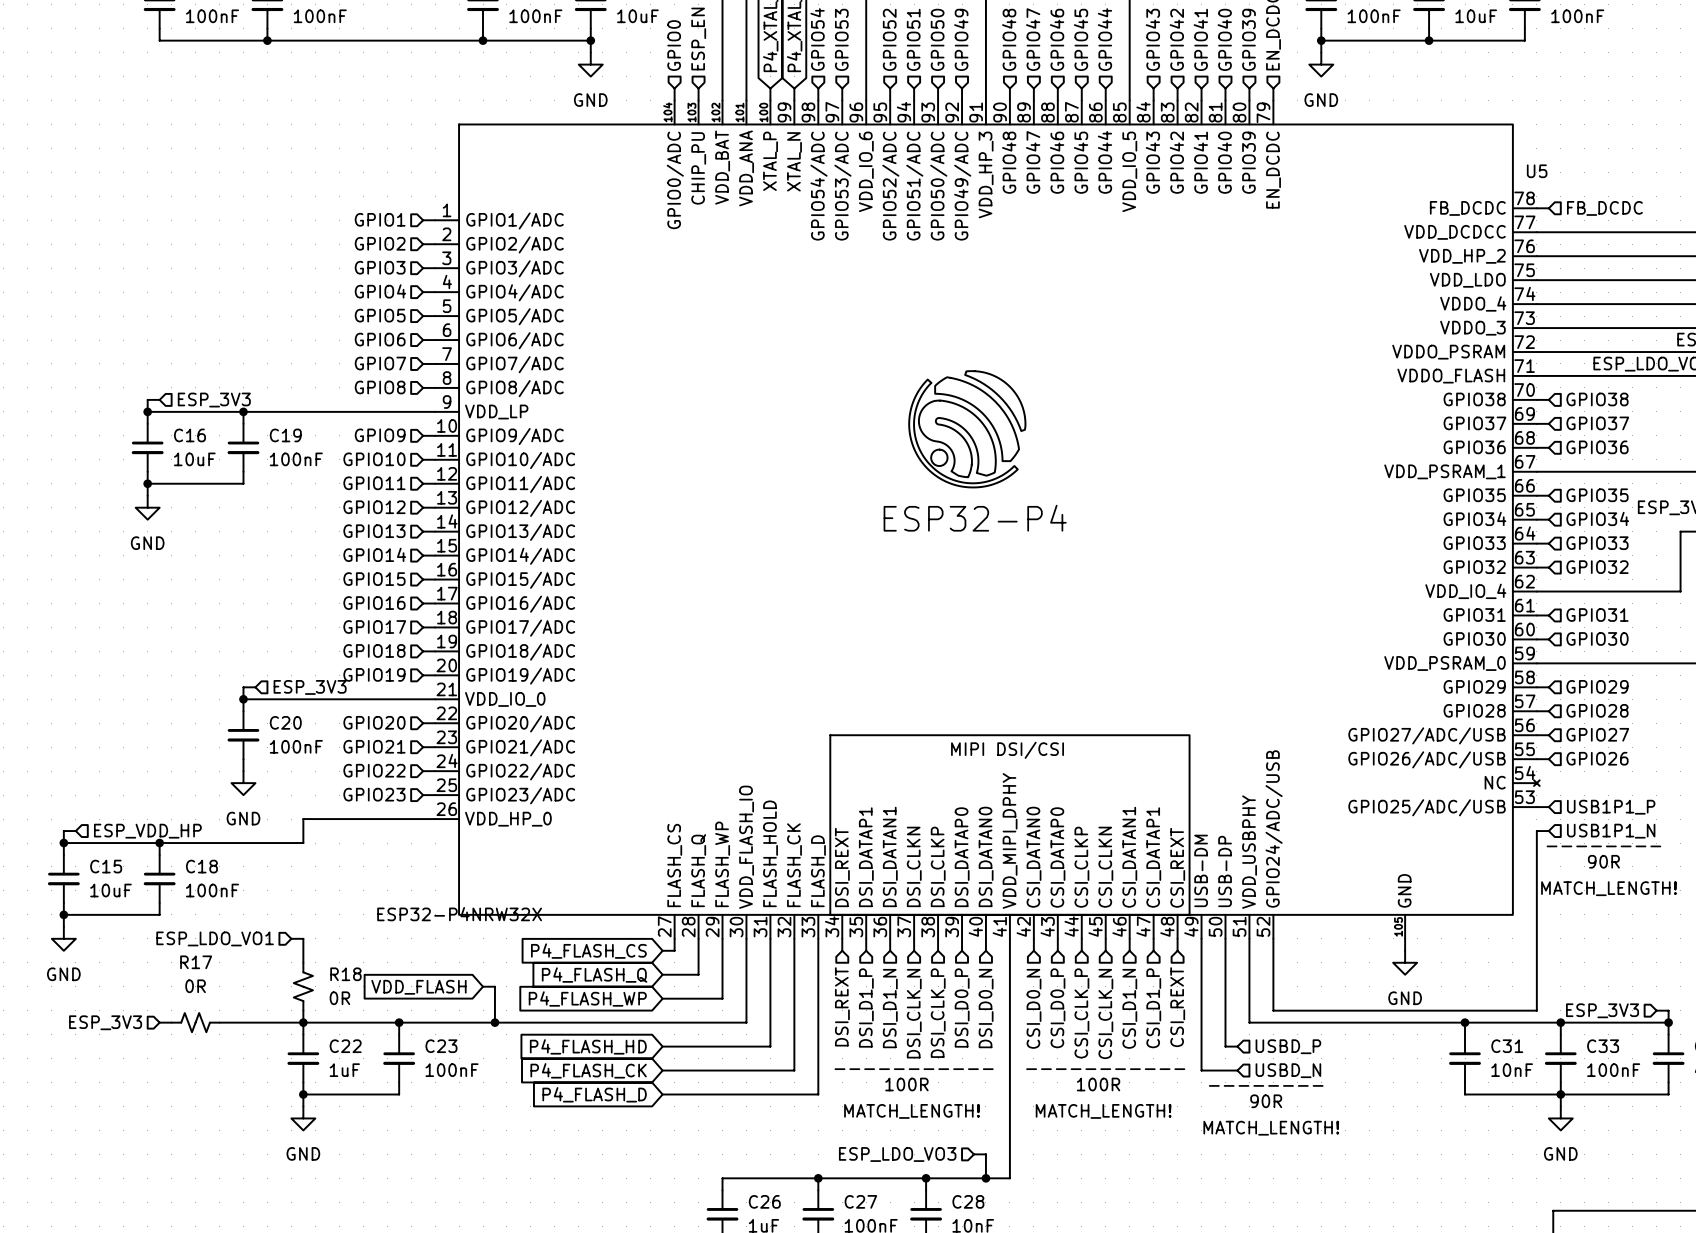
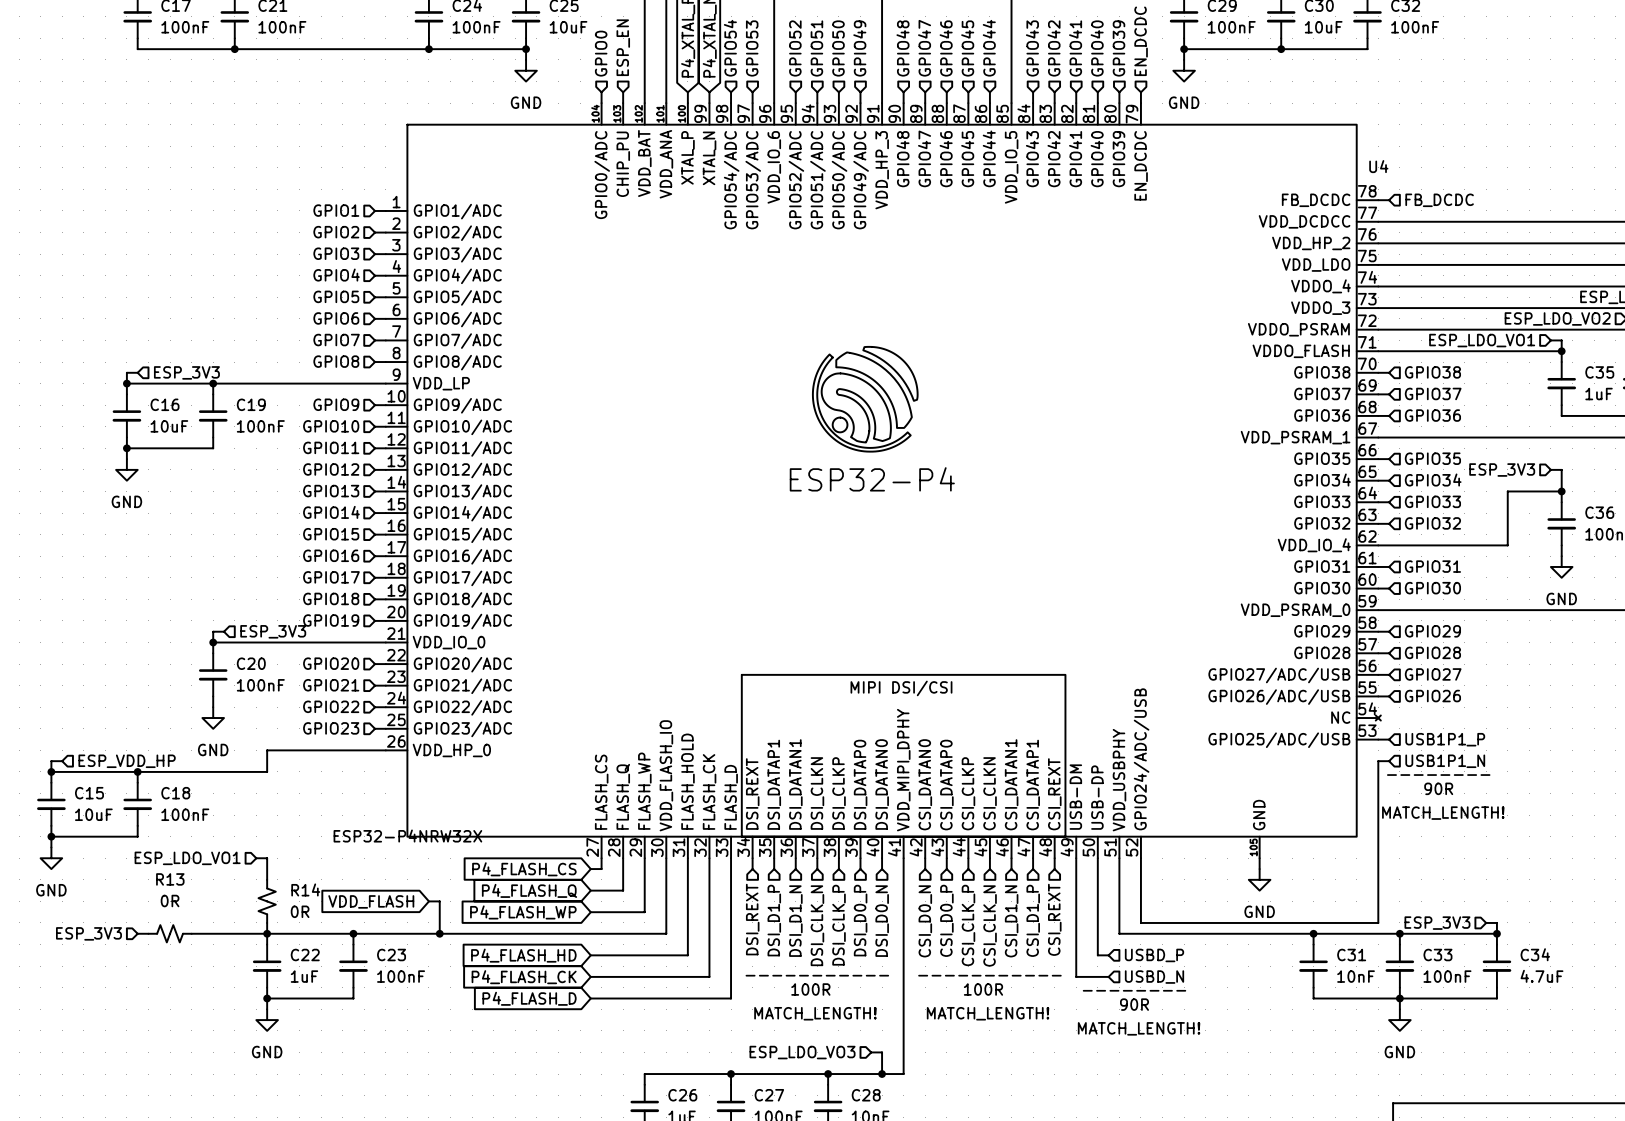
U5 name: U5 (1537, 171) -> U4 (1378, 166)
R17 name: R17 (196, 962) -> R13 (170, 879)
R18 name: R18 (345, 974) -> R14 (305, 889)

